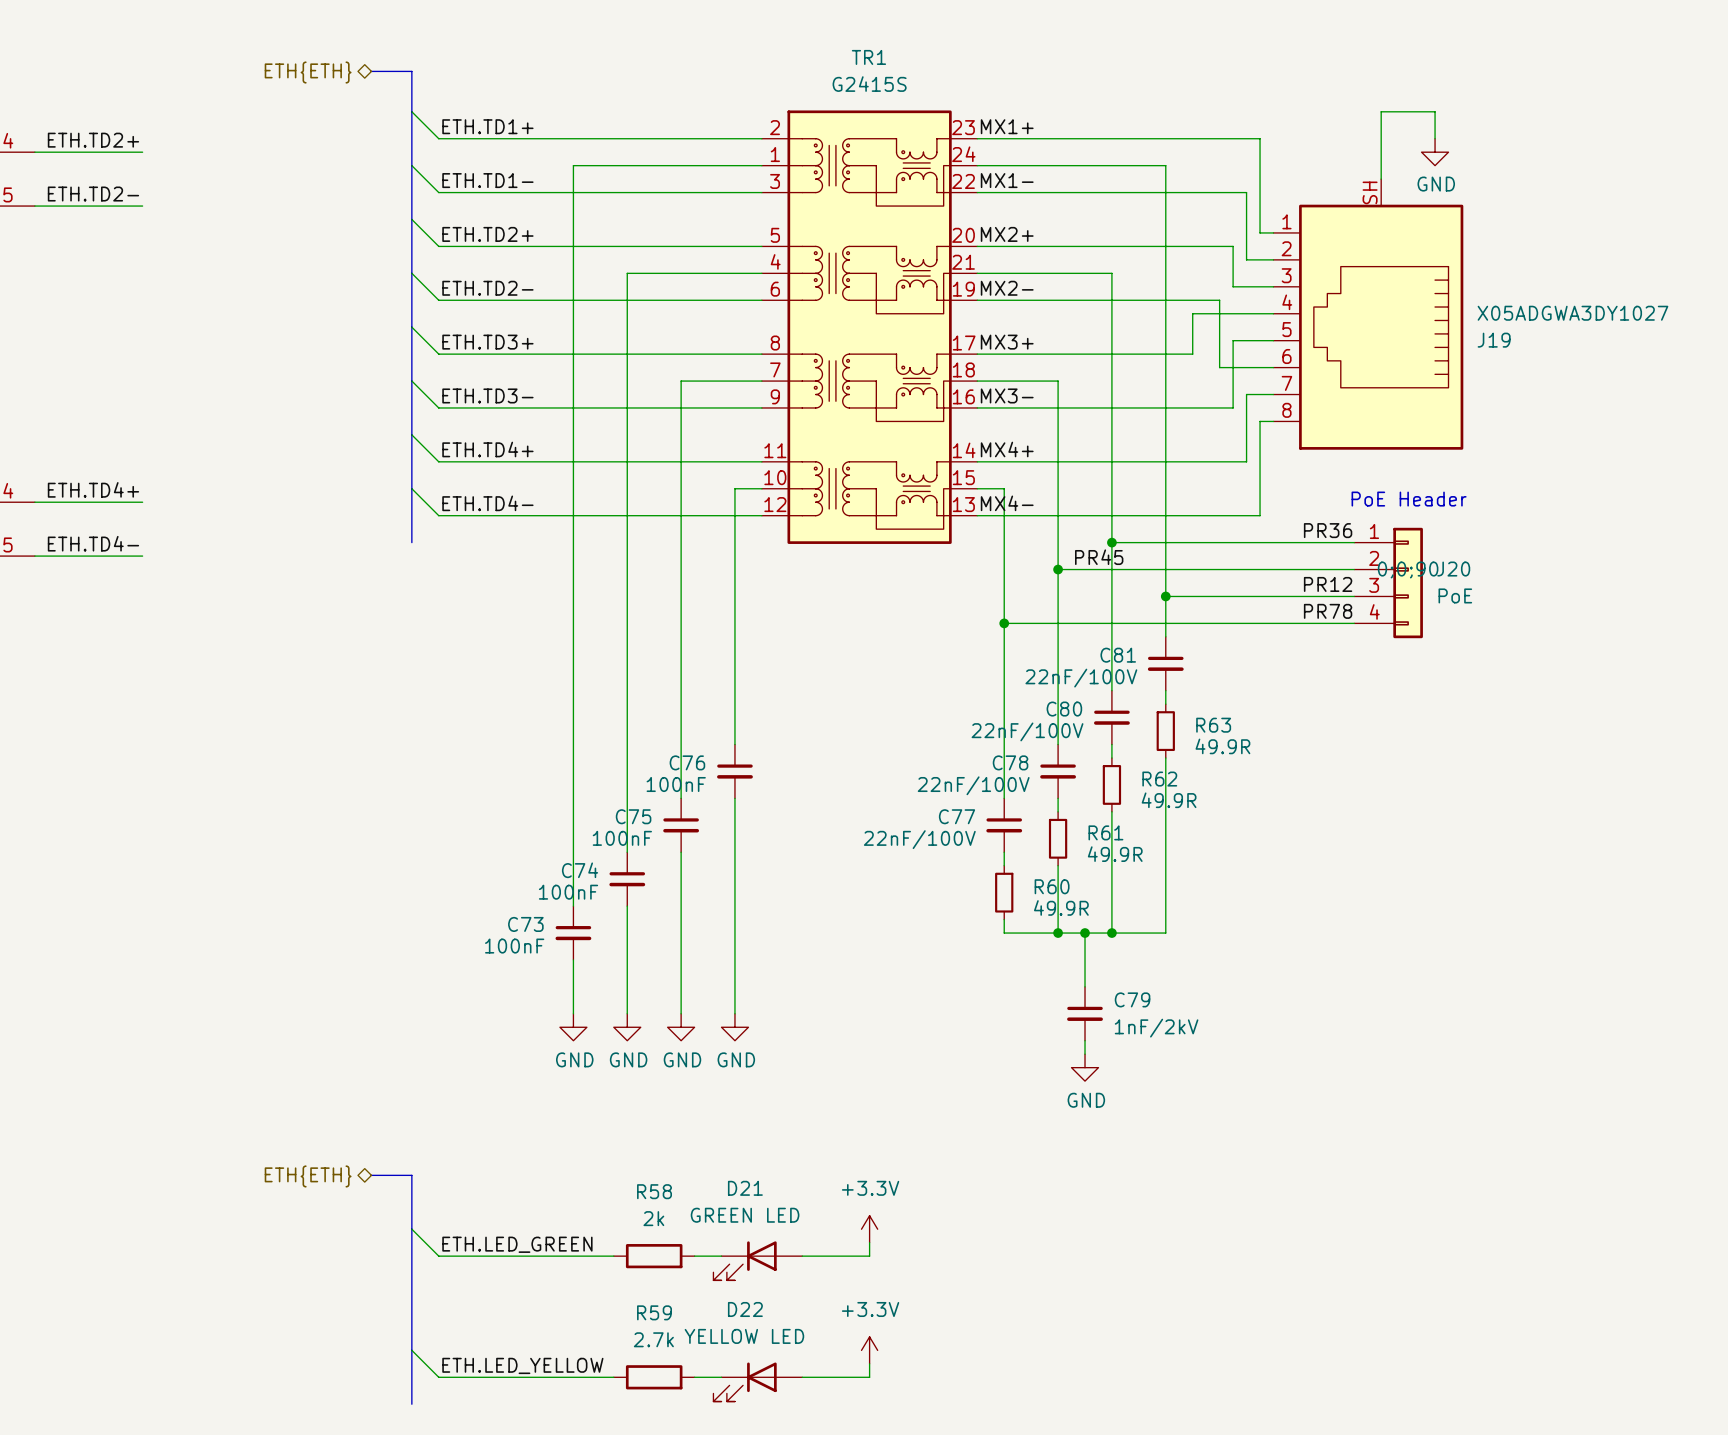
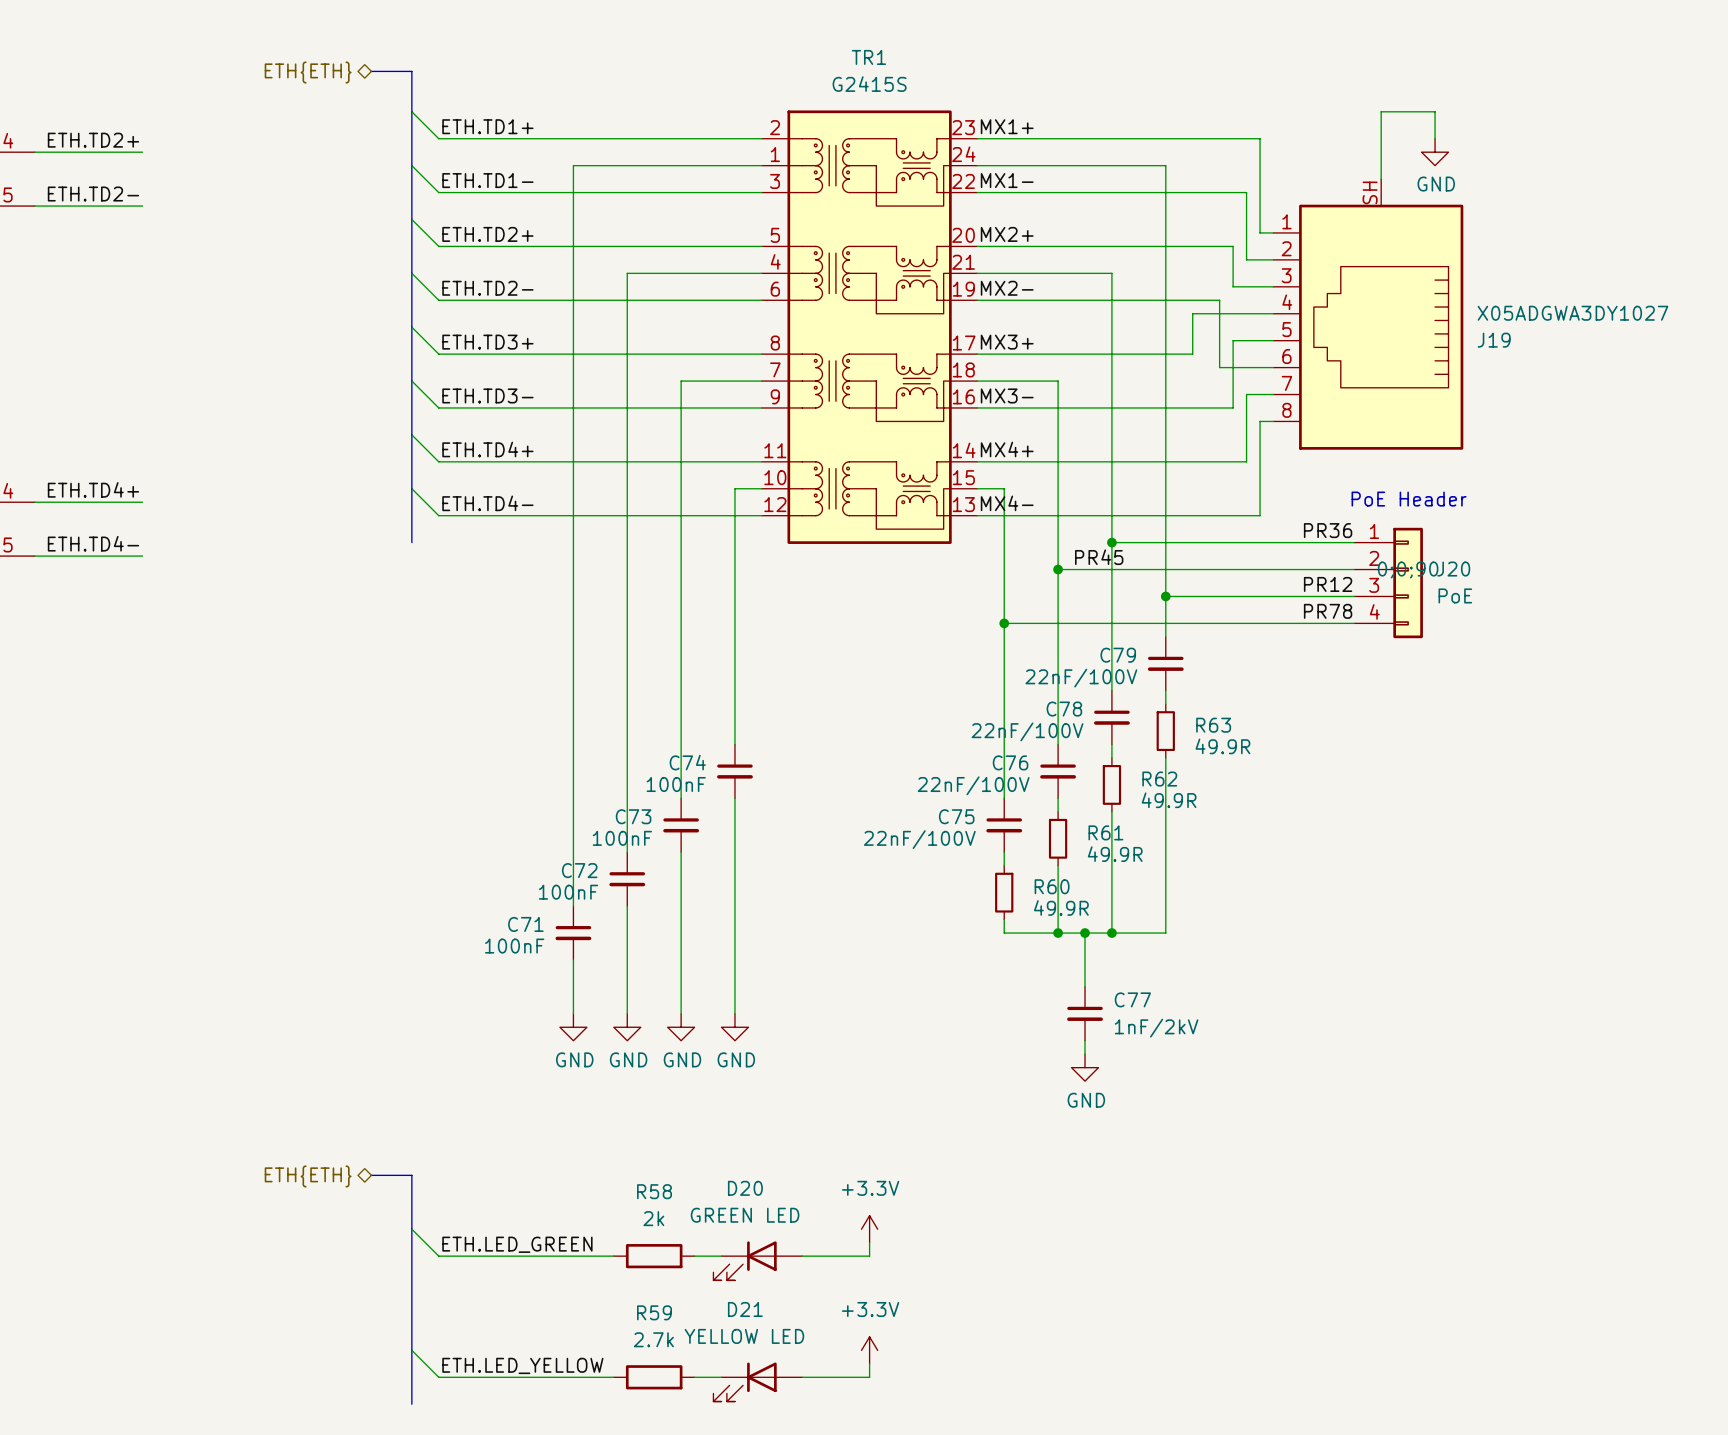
C81 name: C81 (1118, 655) -> C79 (1118, 655)
C80 name: C80 (1064, 709) -> C78 (1064, 709)
C76 name: C76 (687, 762) -> C74 (687, 762)
C78 name: C78 (1010, 762) -> C76 (1010, 762)
C75 name: C75 (633, 816) -> C73 (633, 816)
C77 name: C77 (957, 816) -> C75 (956, 816)
C74 name: C74 (580, 870) -> C72 (579, 870)
C73 name: C73 (525, 924) -> C71 (525, 924)
C79 name: C79 (1132, 999) -> C77 (1132, 999)
D21 name: D21 (745, 1188) -> D20 (745, 1188)
D22 name: D22 (745, 1309) -> D21 (745, 1309)

